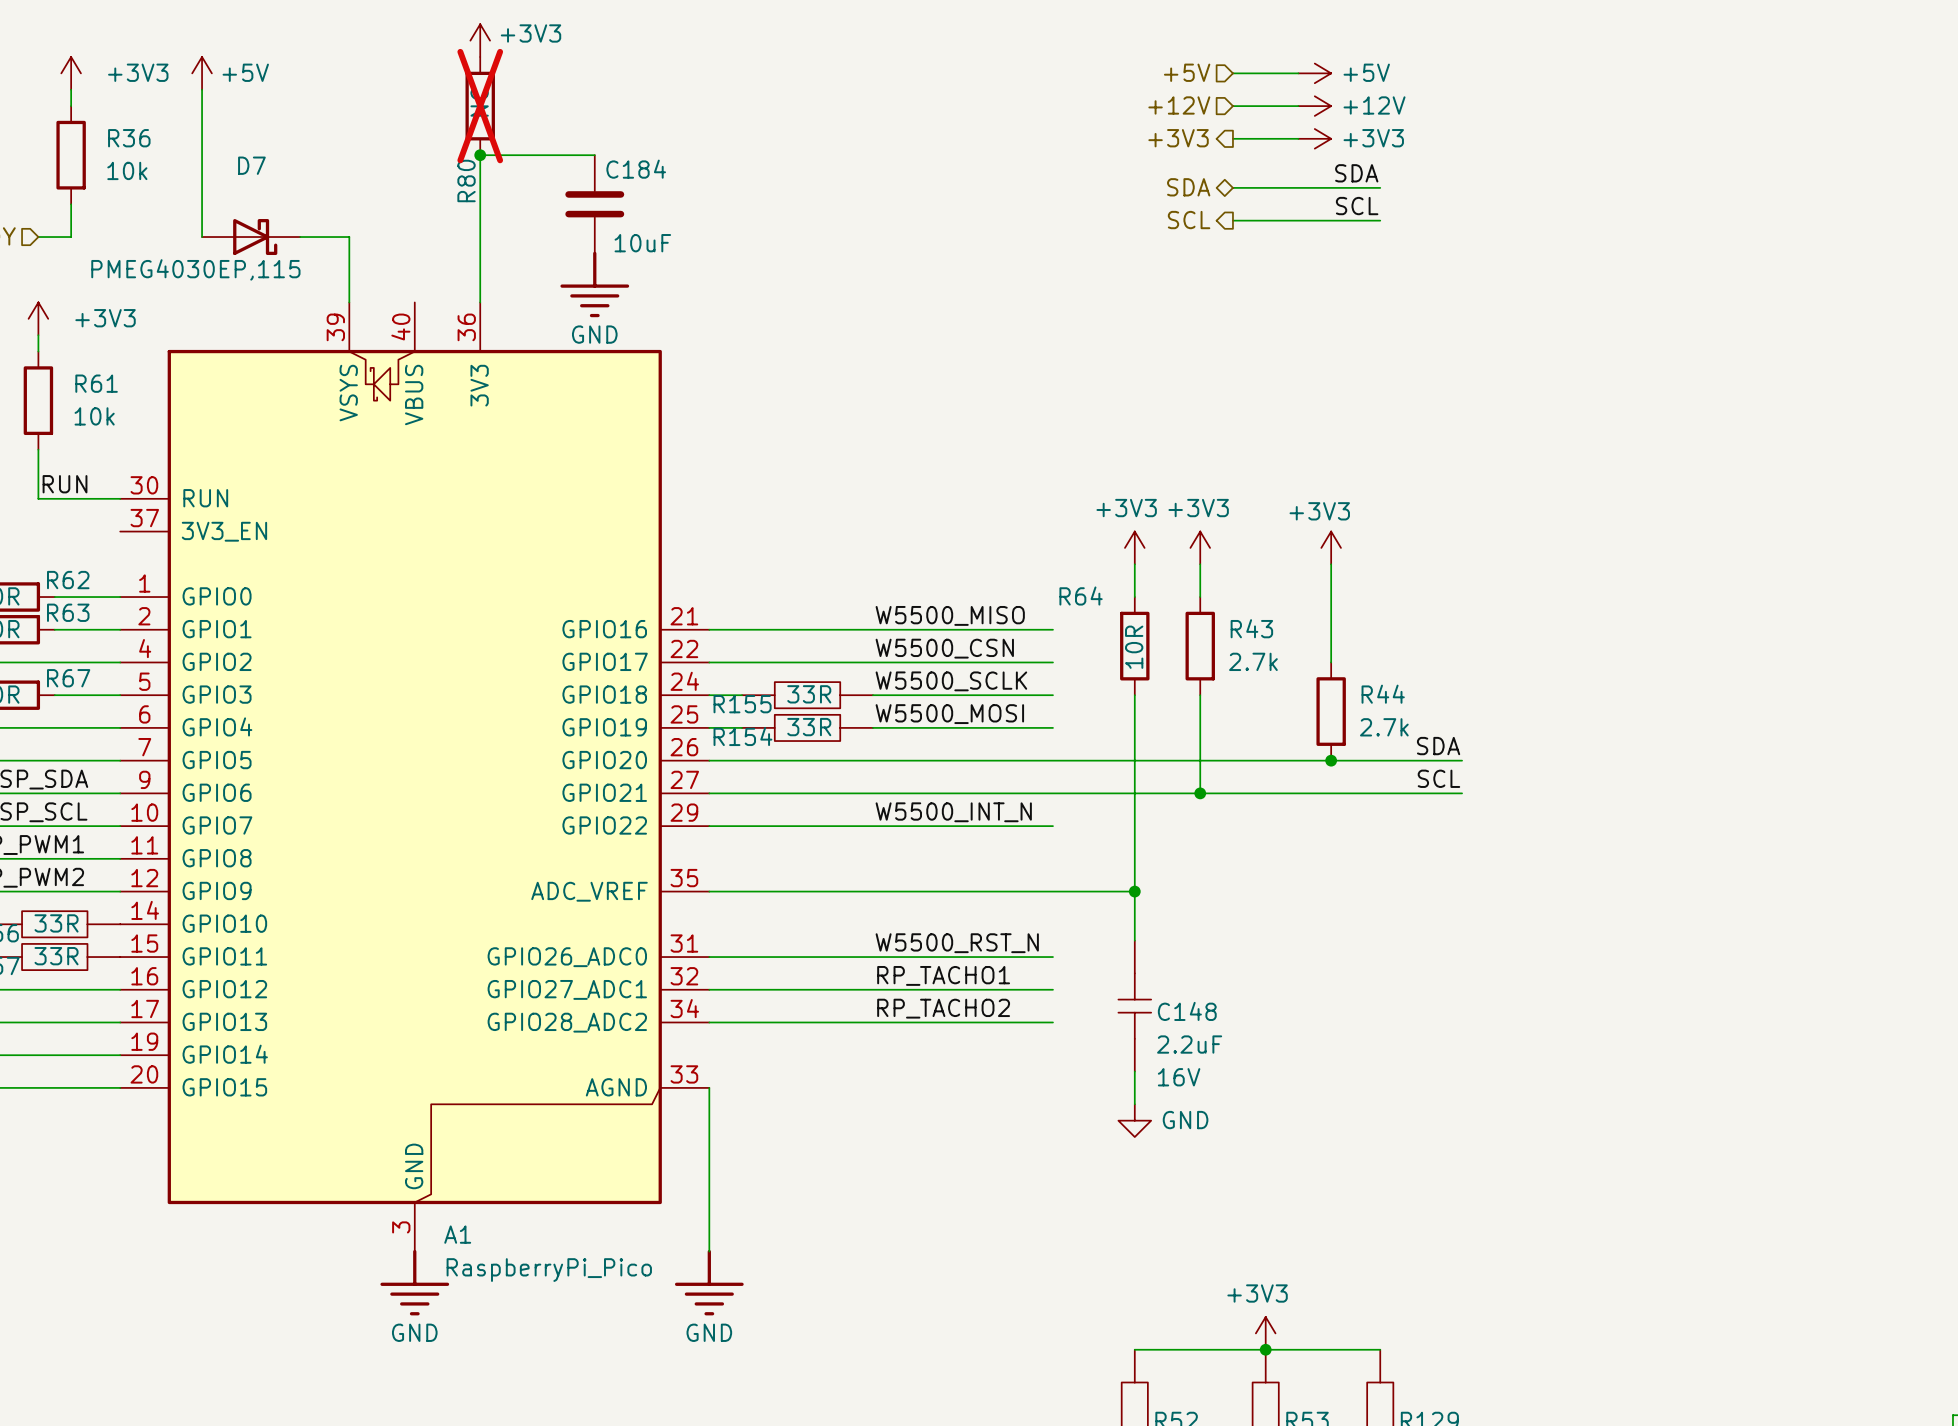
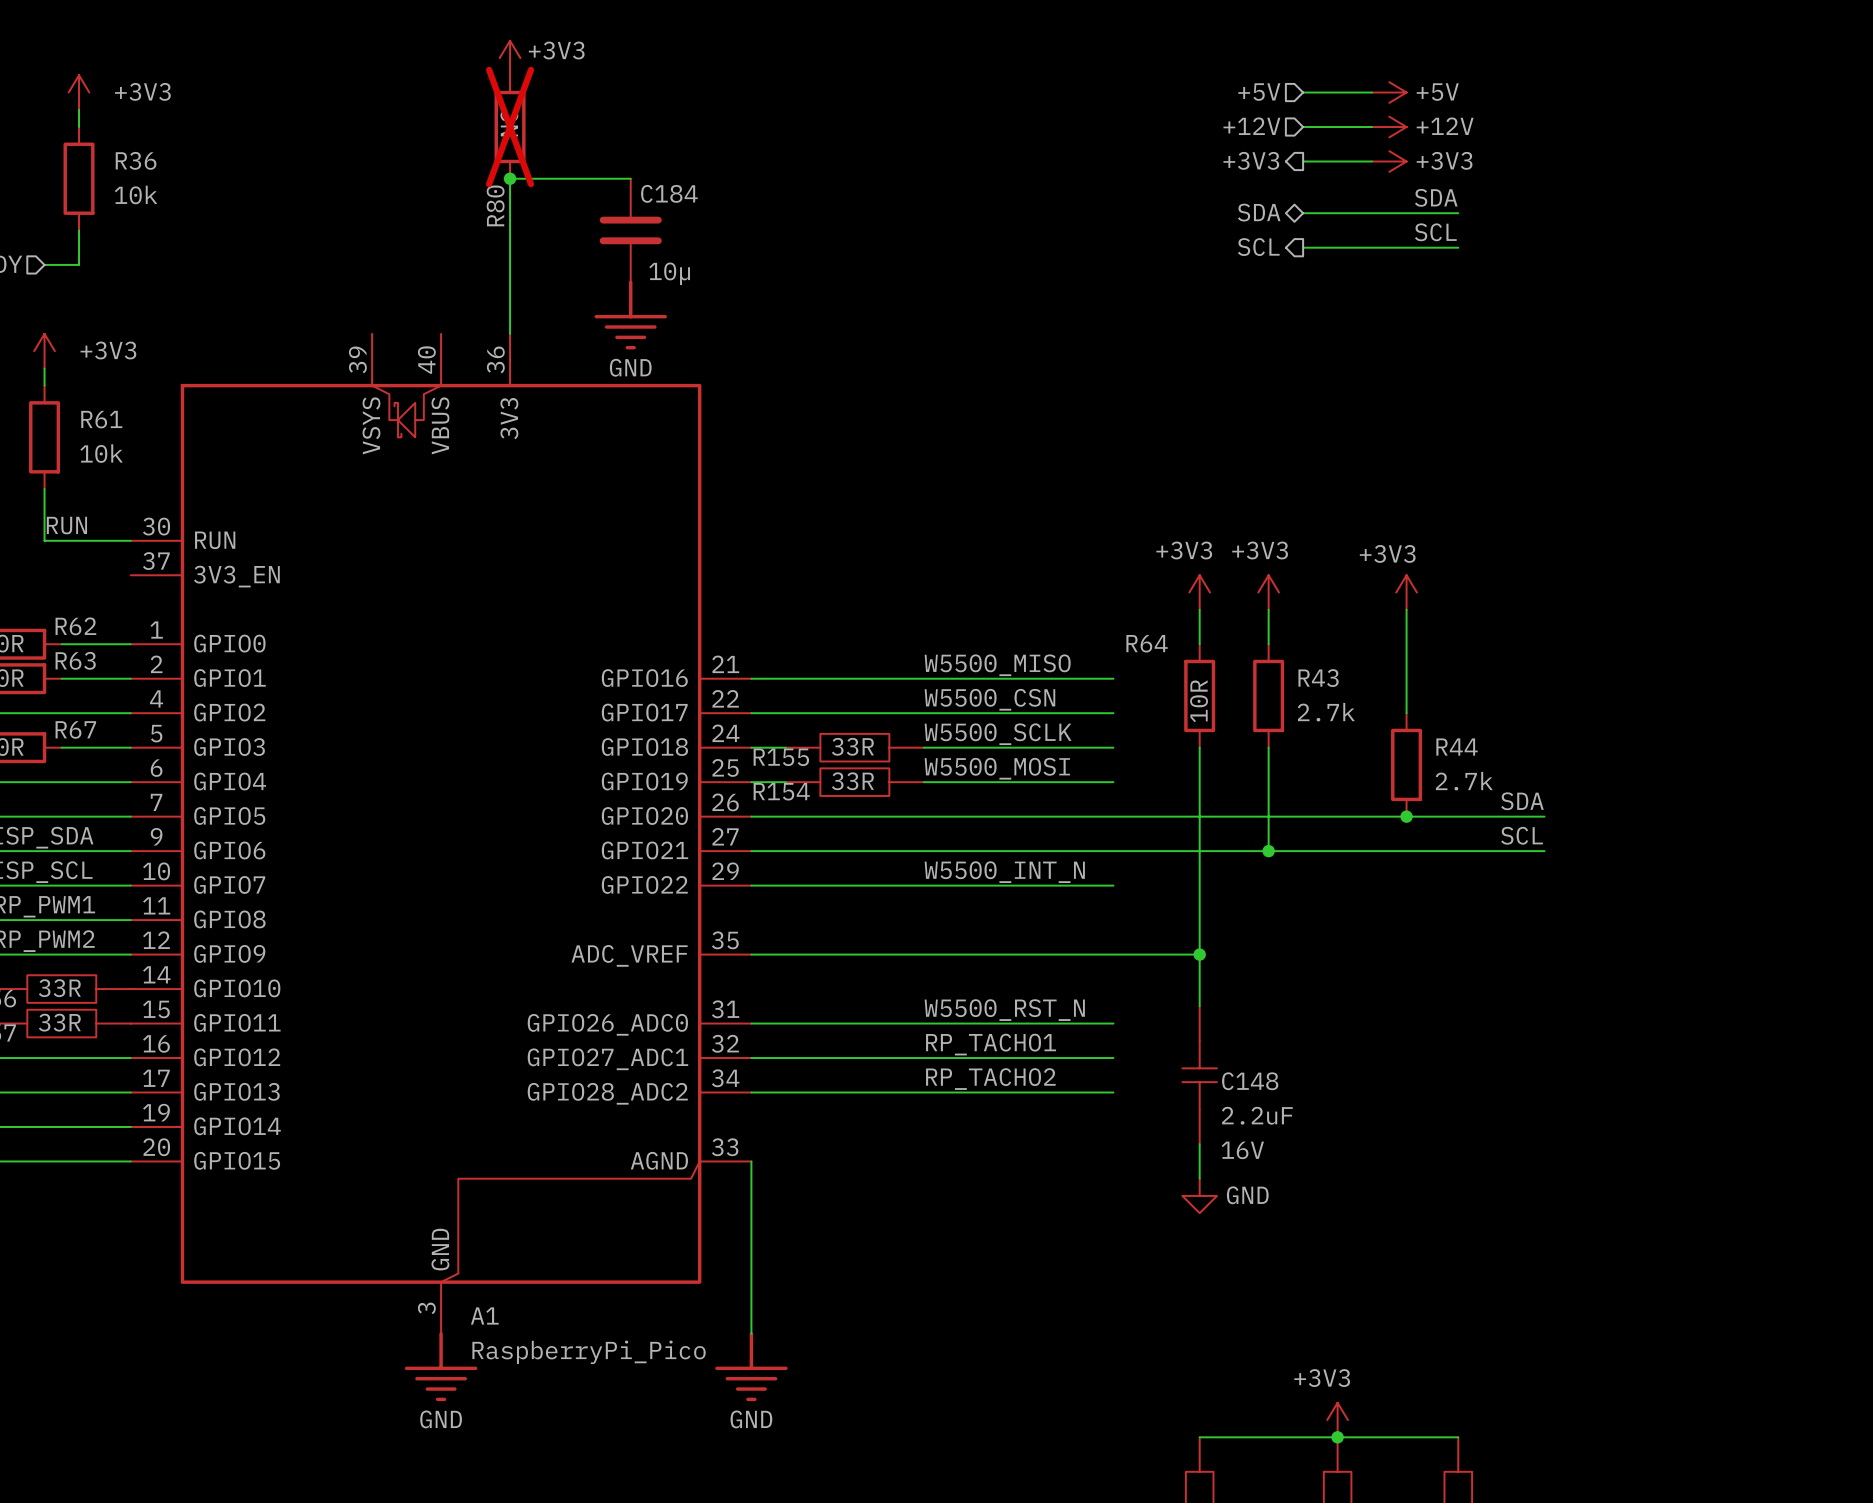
power symbol: +5V (202, 73) -> none
wire: (202, 89) (202, 237) -> none
D7: PMEG4030EP,115 (251, 237) -> none
wire: (300, 237) (349, 237) (349, 302) -> none
C184 value: 10uF (642, 243) -> 10µ (669, 273)

